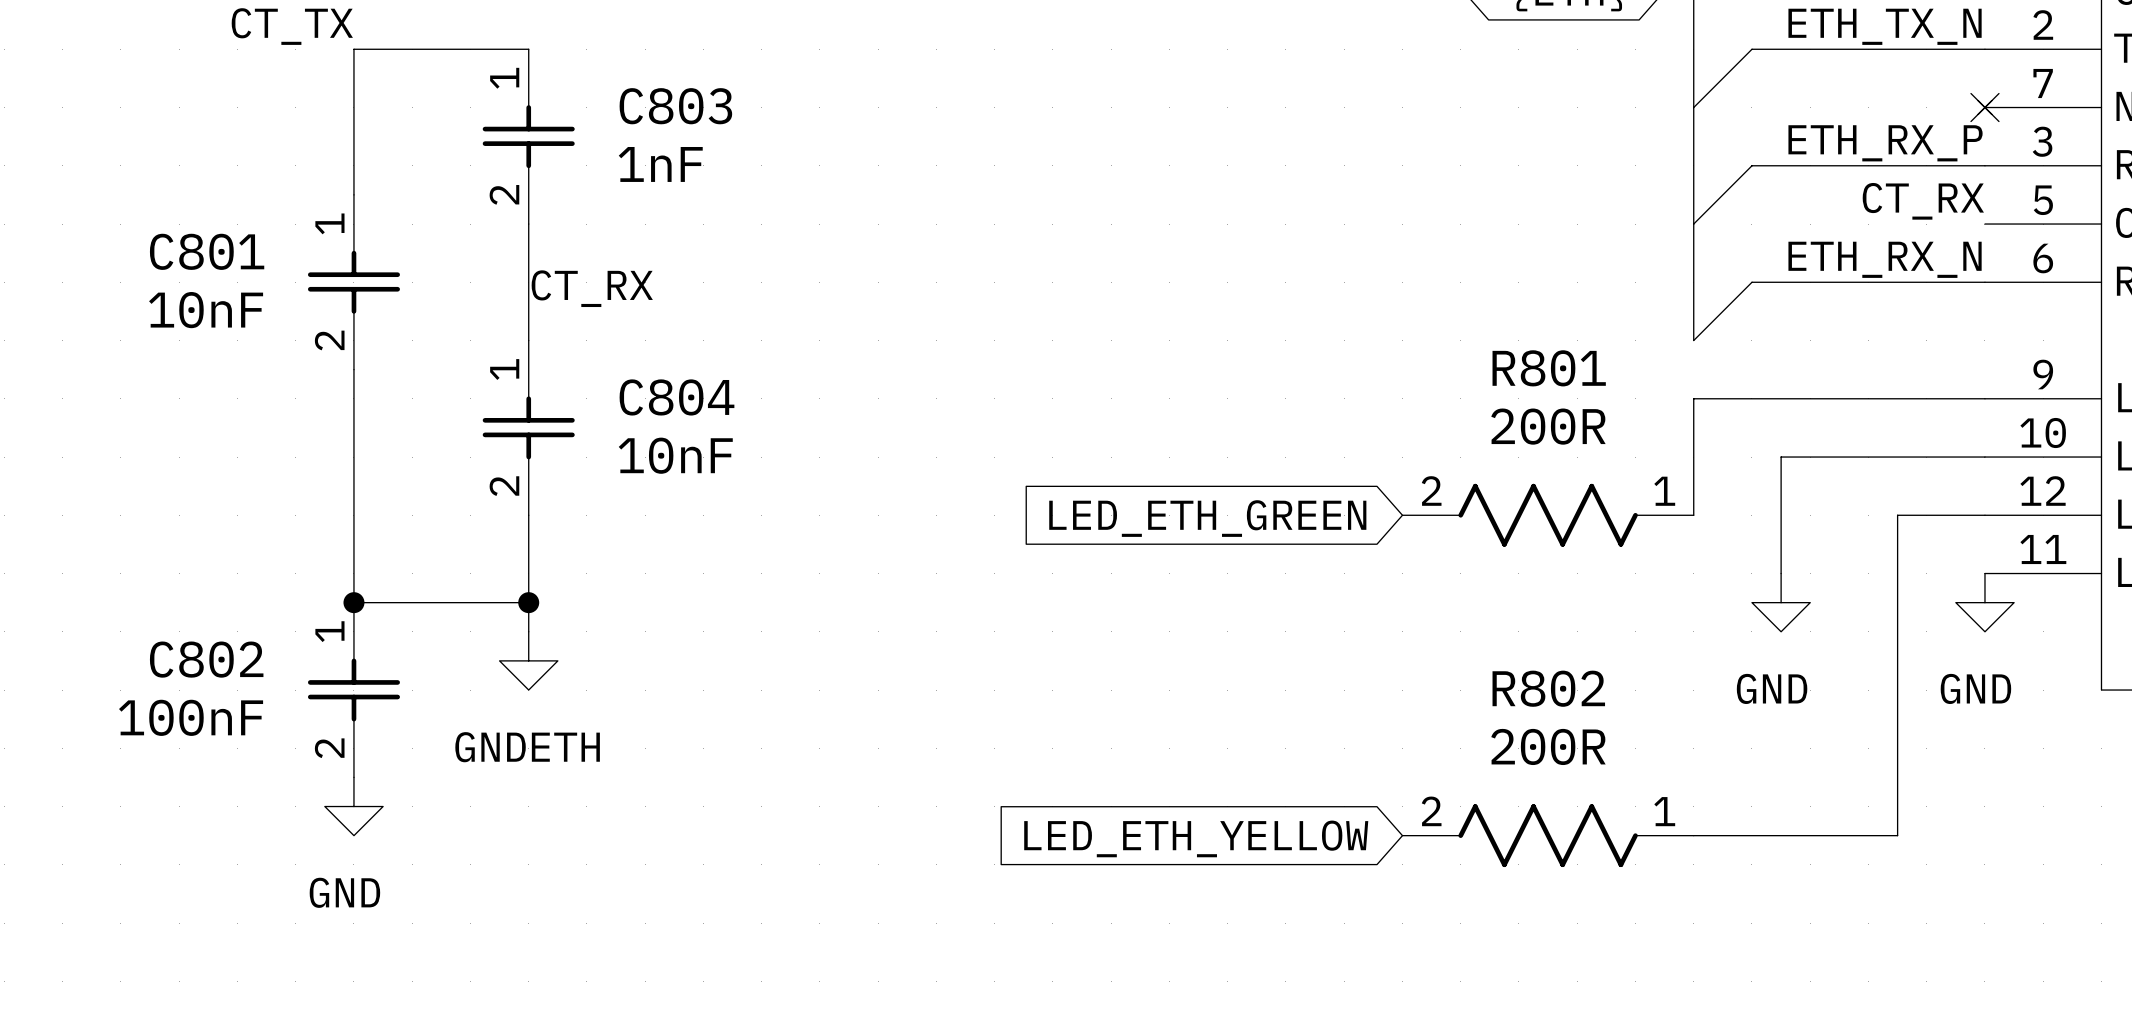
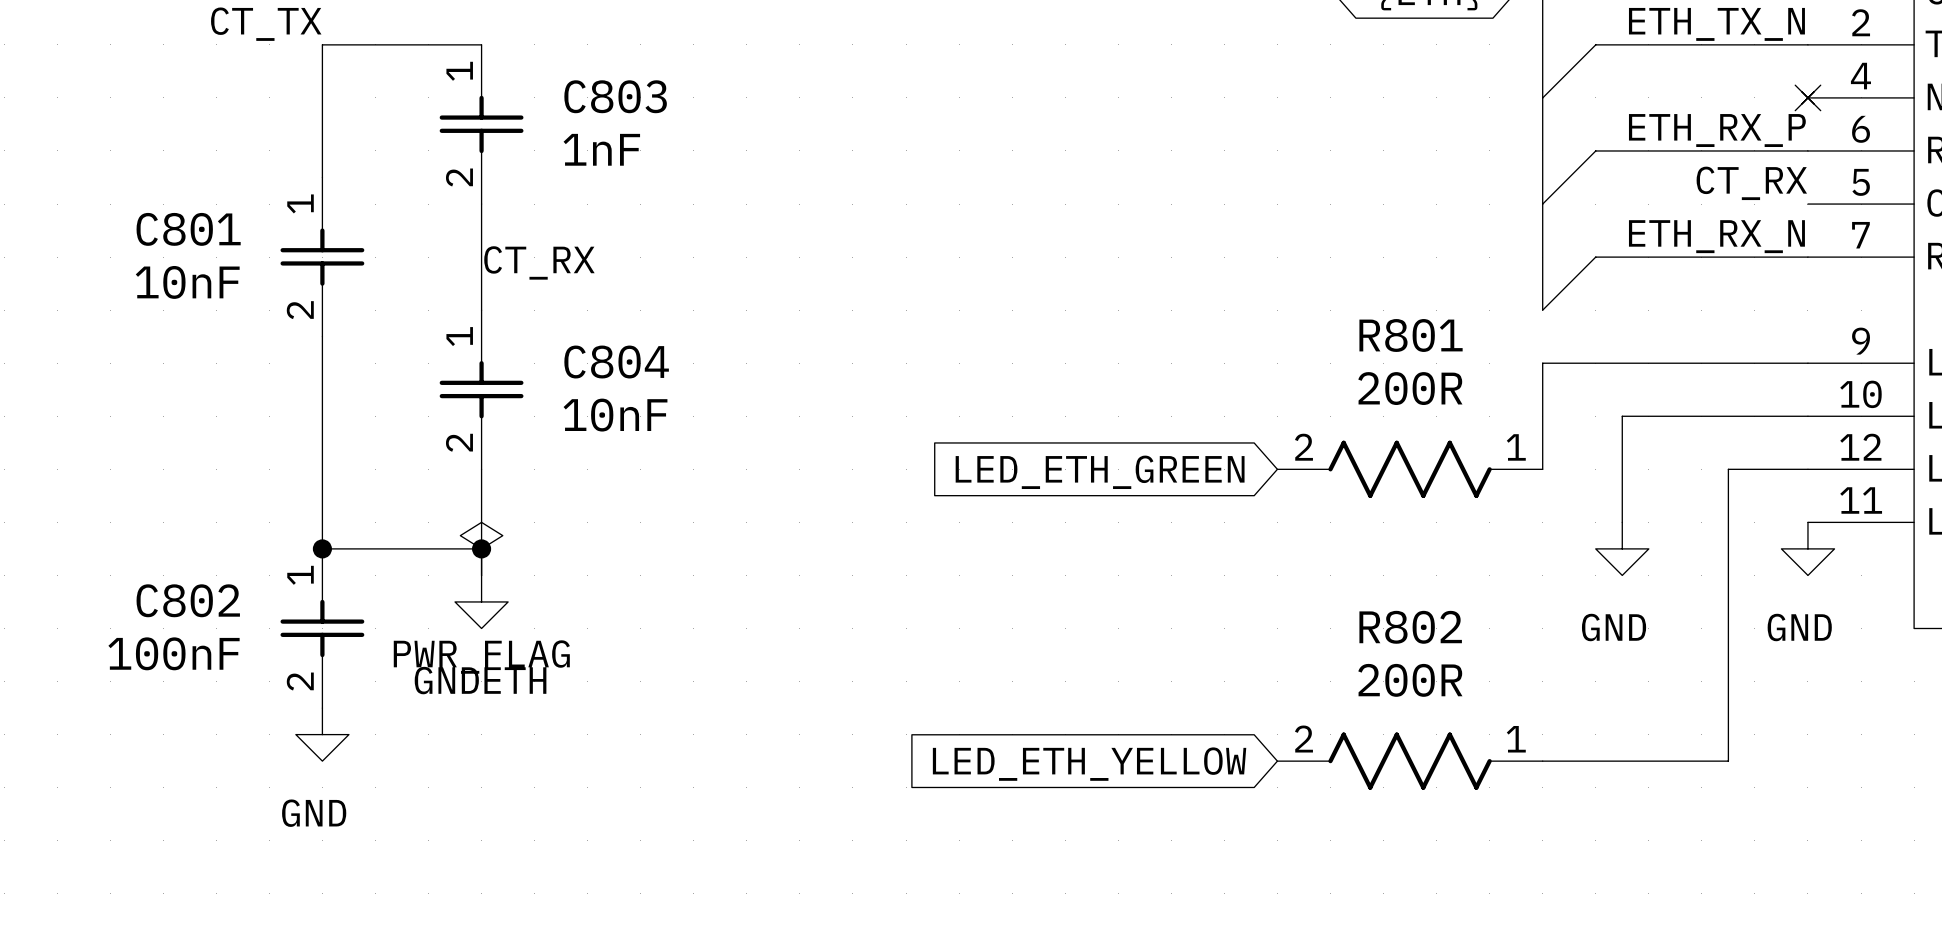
part pin number: 7 (2043, 83) -> 4 (1860, 76)
part pin number: 3 (2042, 141) -> 6 (1861, 129)
part pin number: 6 (2043, 258) -> 7 (1860, 235)
power symbol: none -> PWR_FLAG (481, 548)

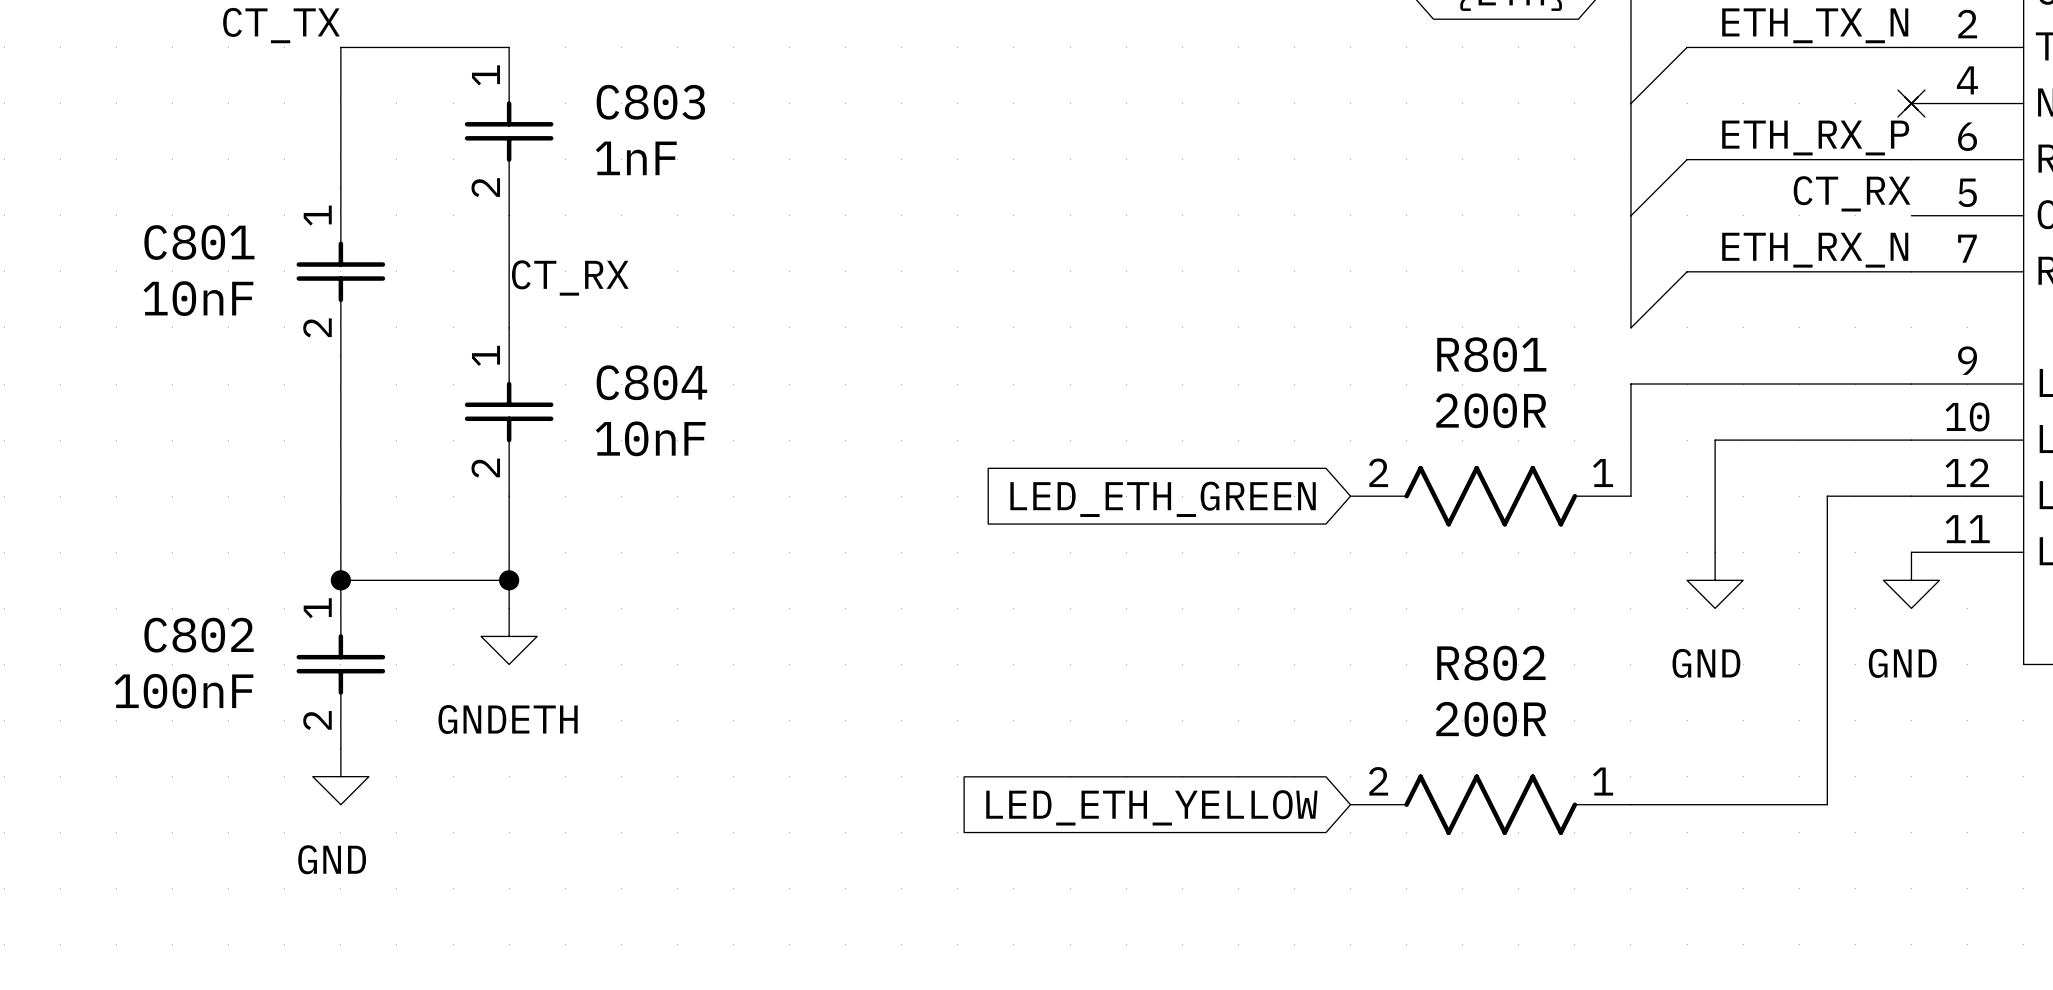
power symbol: PWR_FLAG (481, 548) -> none

